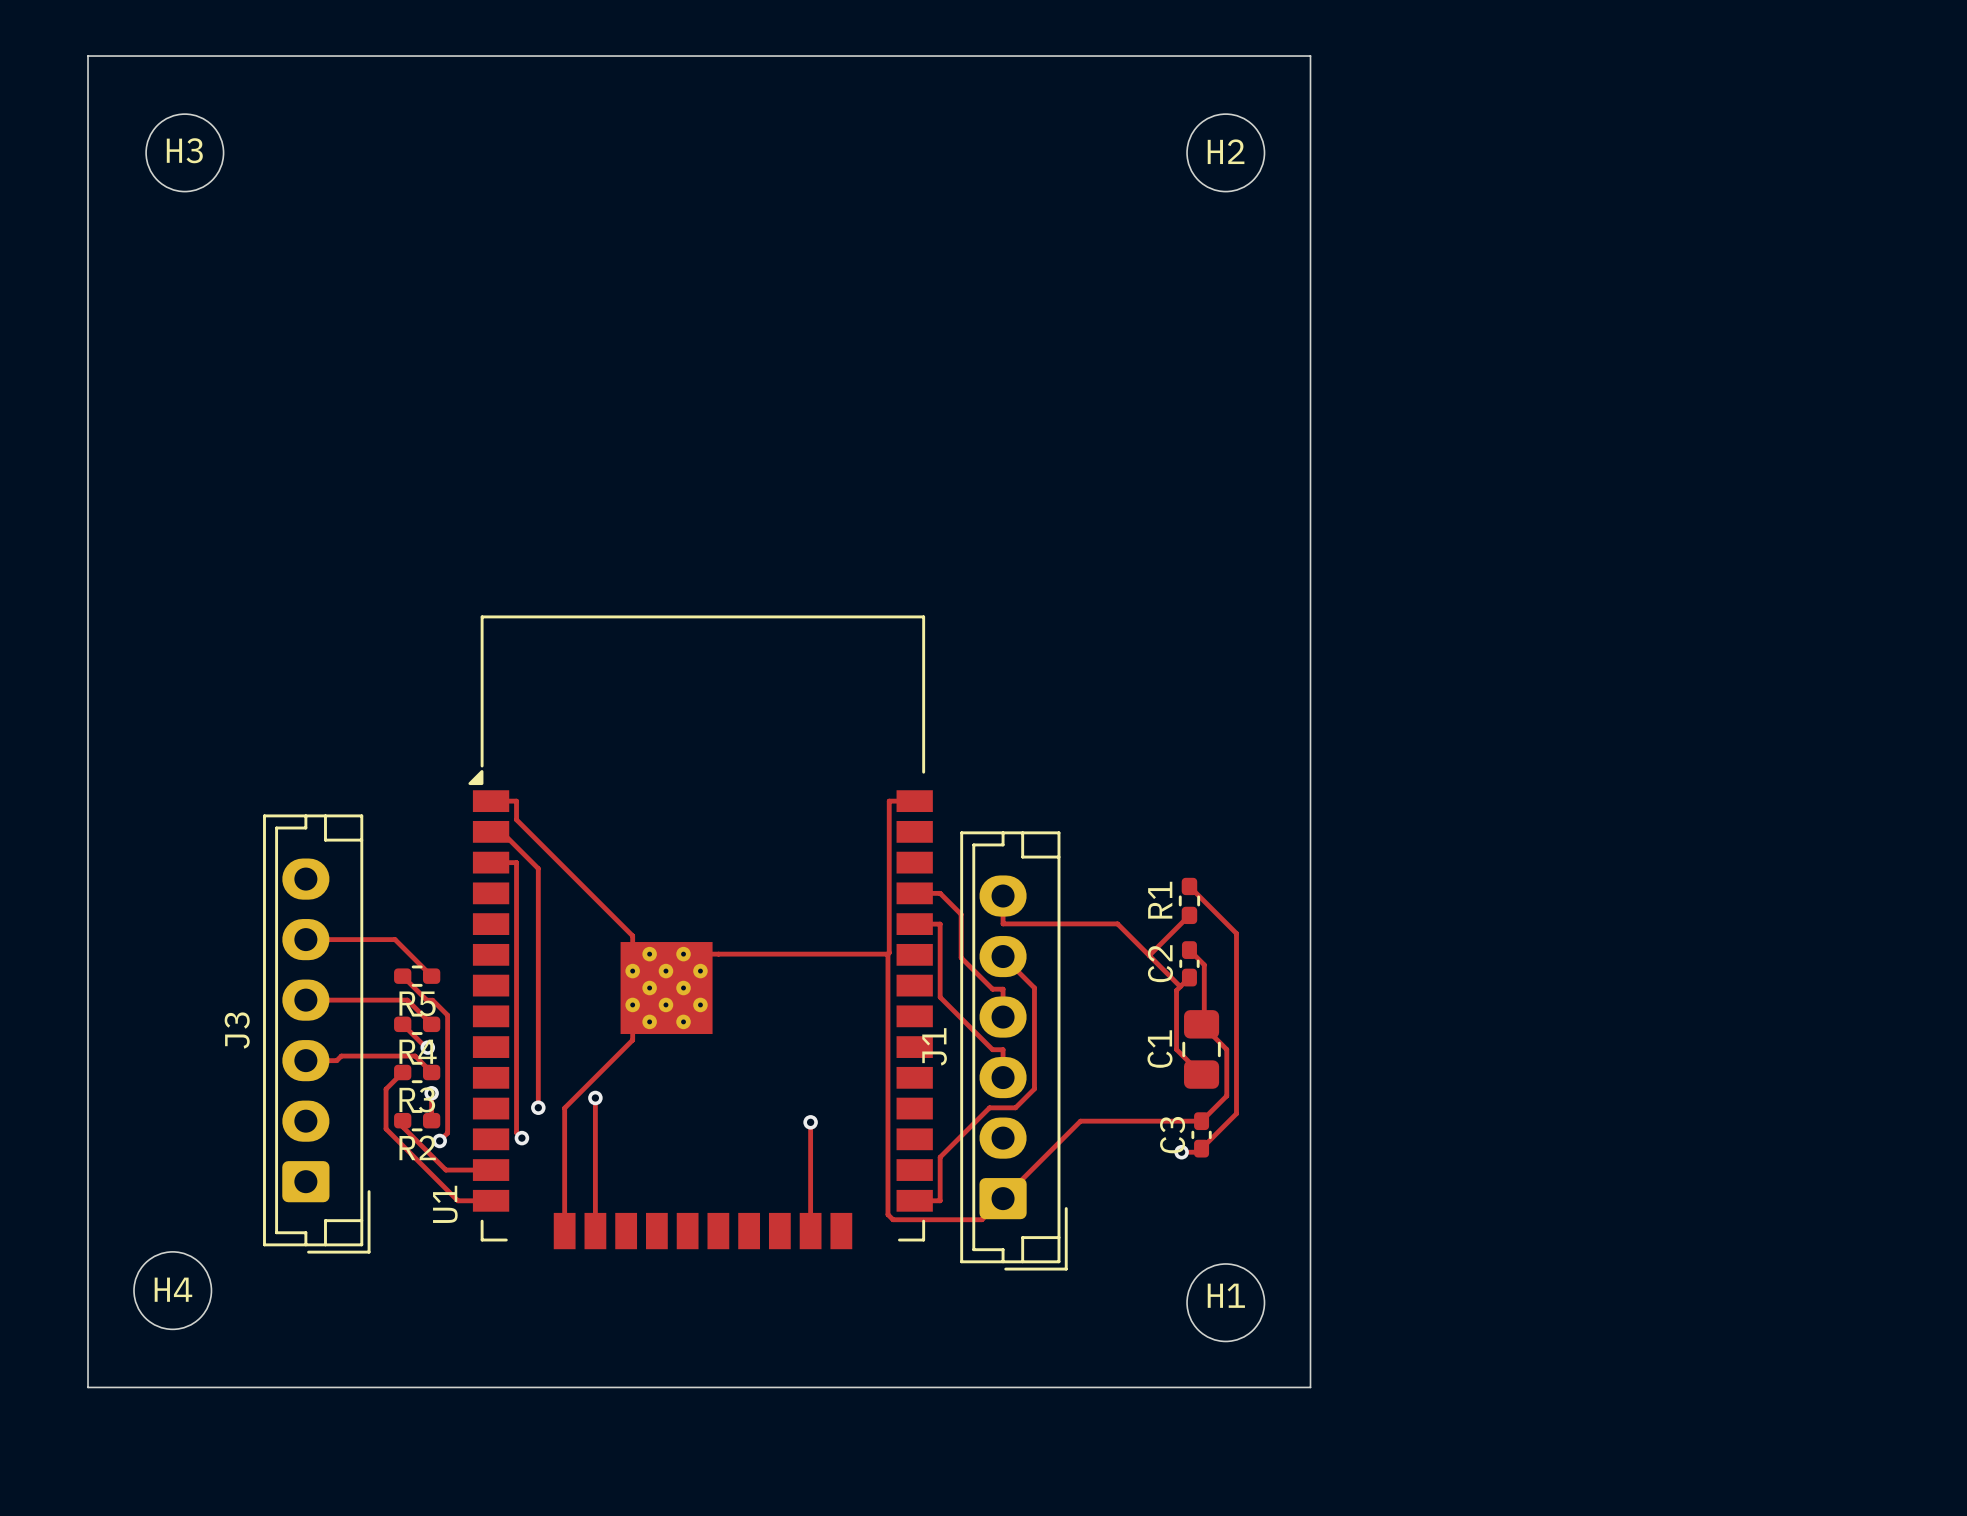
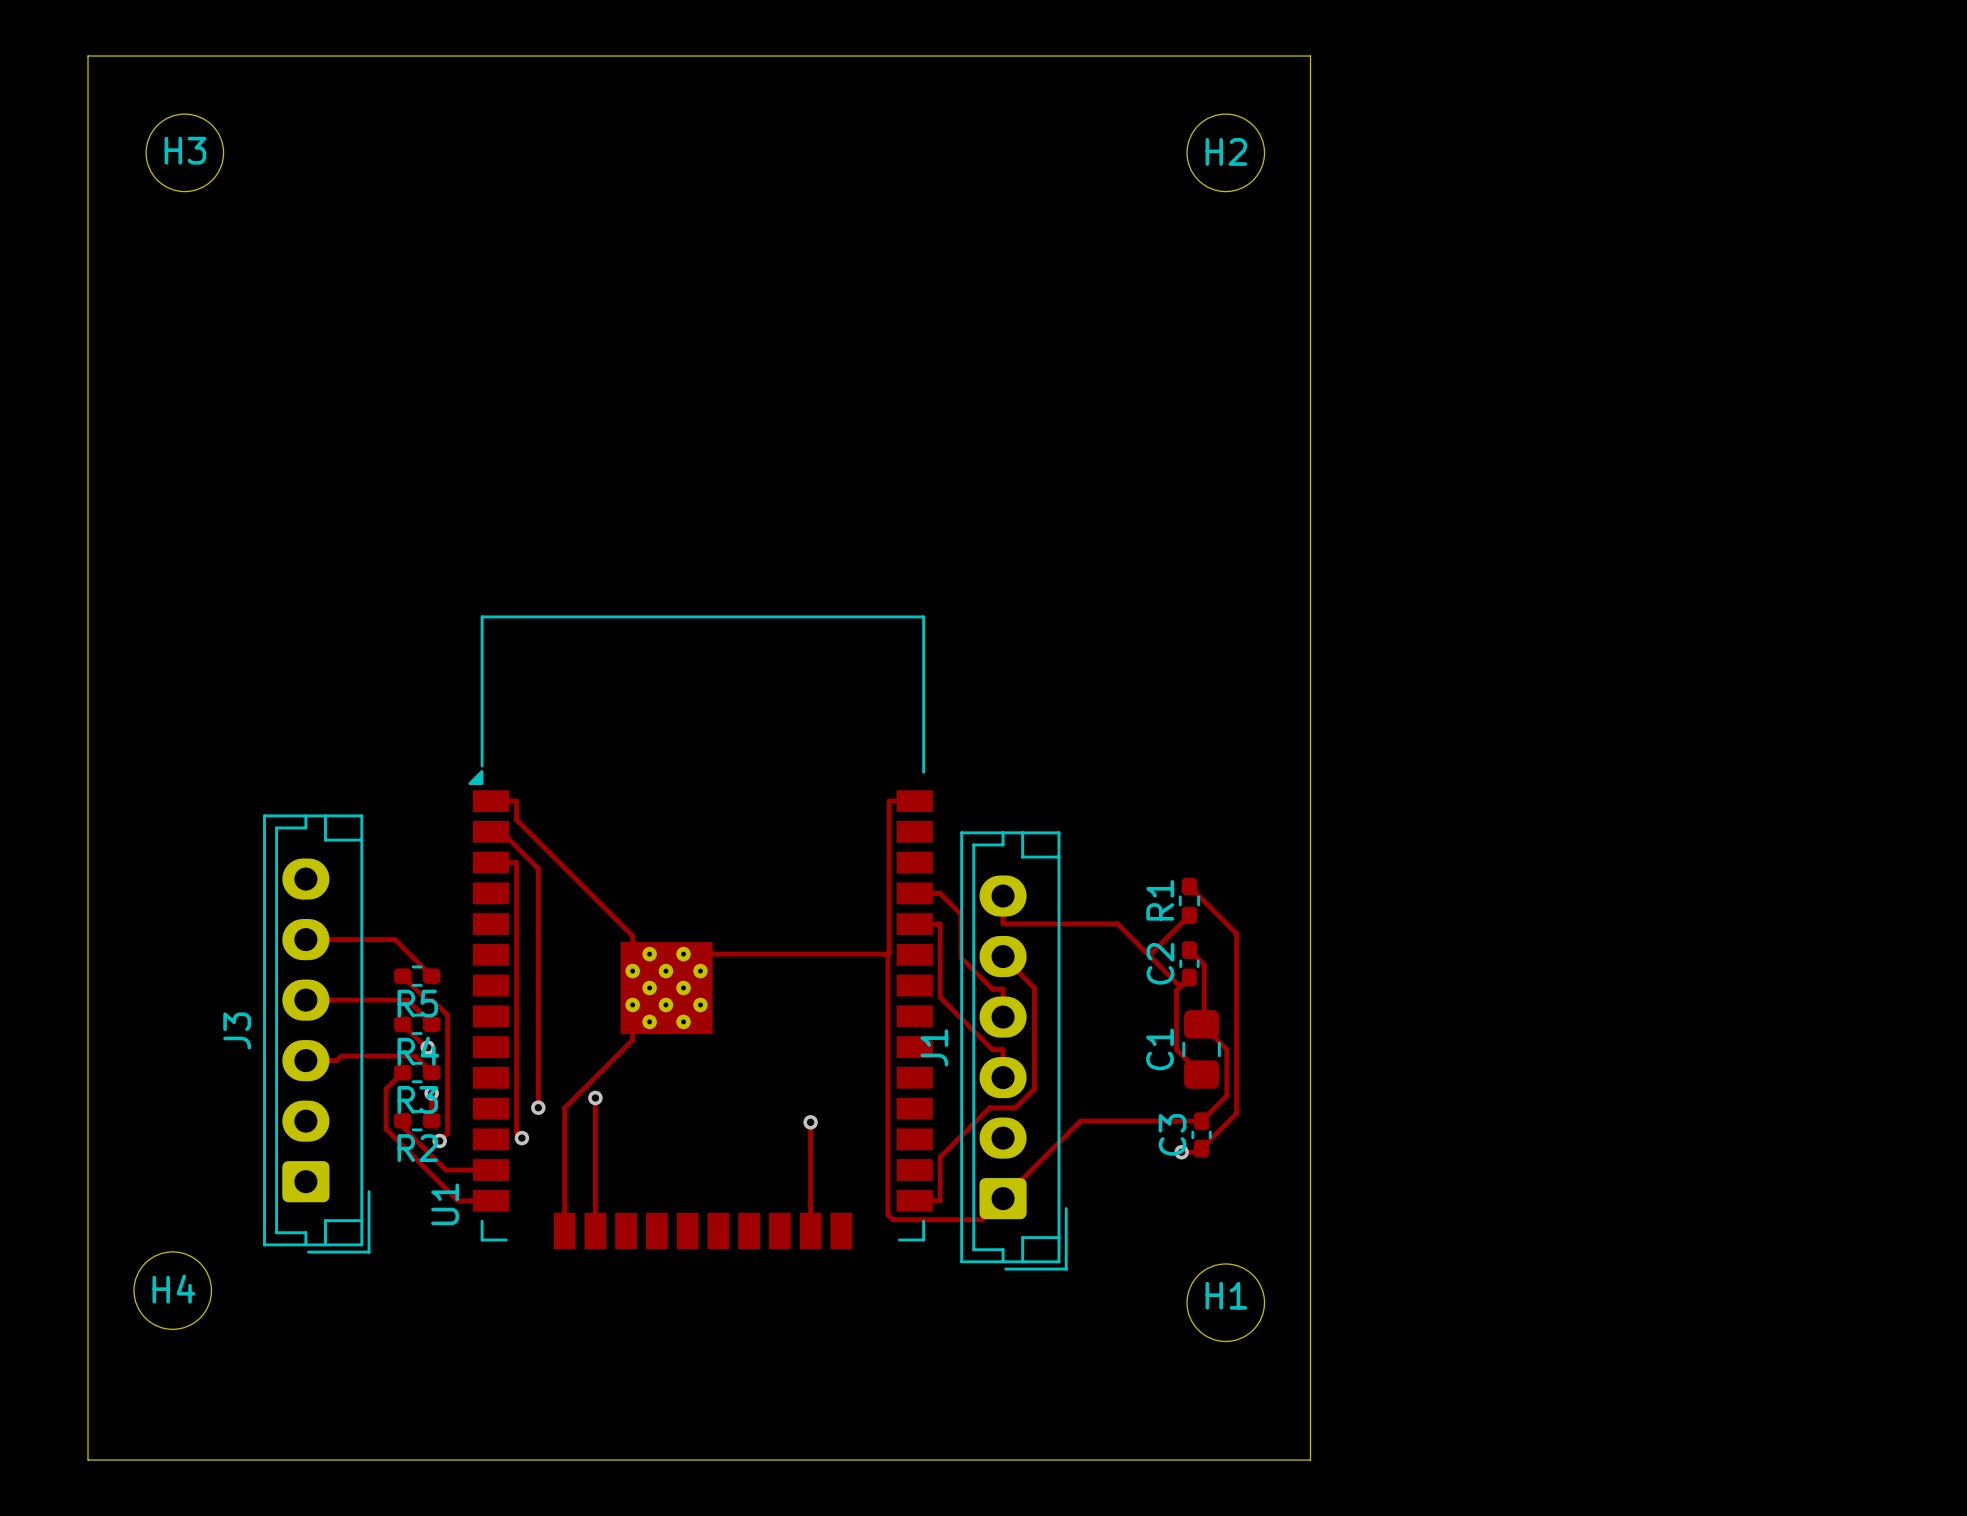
board edge: (88, 1387) (1310, 1387) -> (88, 1387) (88, 1460) (1310, 1460) (1310, 1387)

